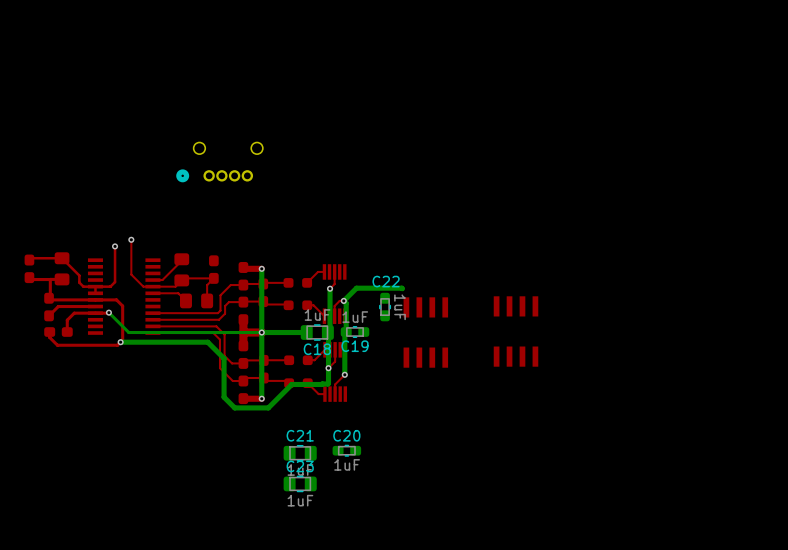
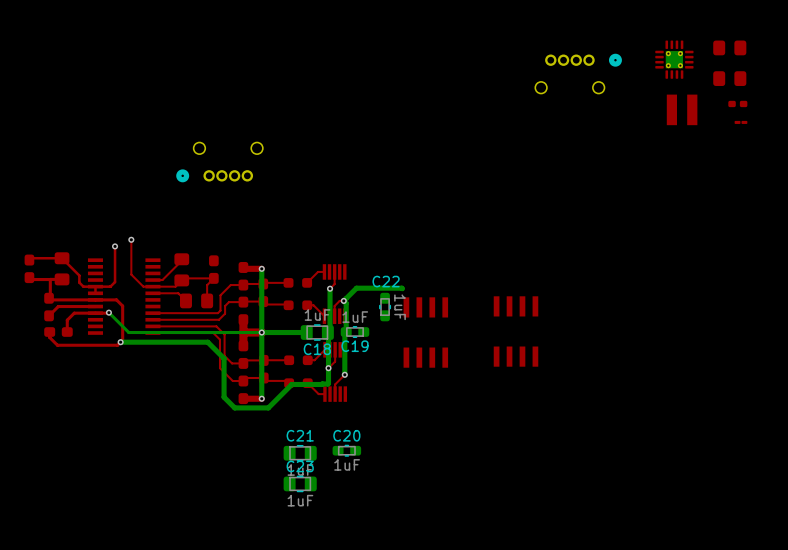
part: none -> (729, 47)
part: none -> (674, 59)
part: none -> (578, 73)
part: none -> (729, 78)
part: none -> (737, 103)
part: none -> (682, 109)
part: none -> (740, 122)

